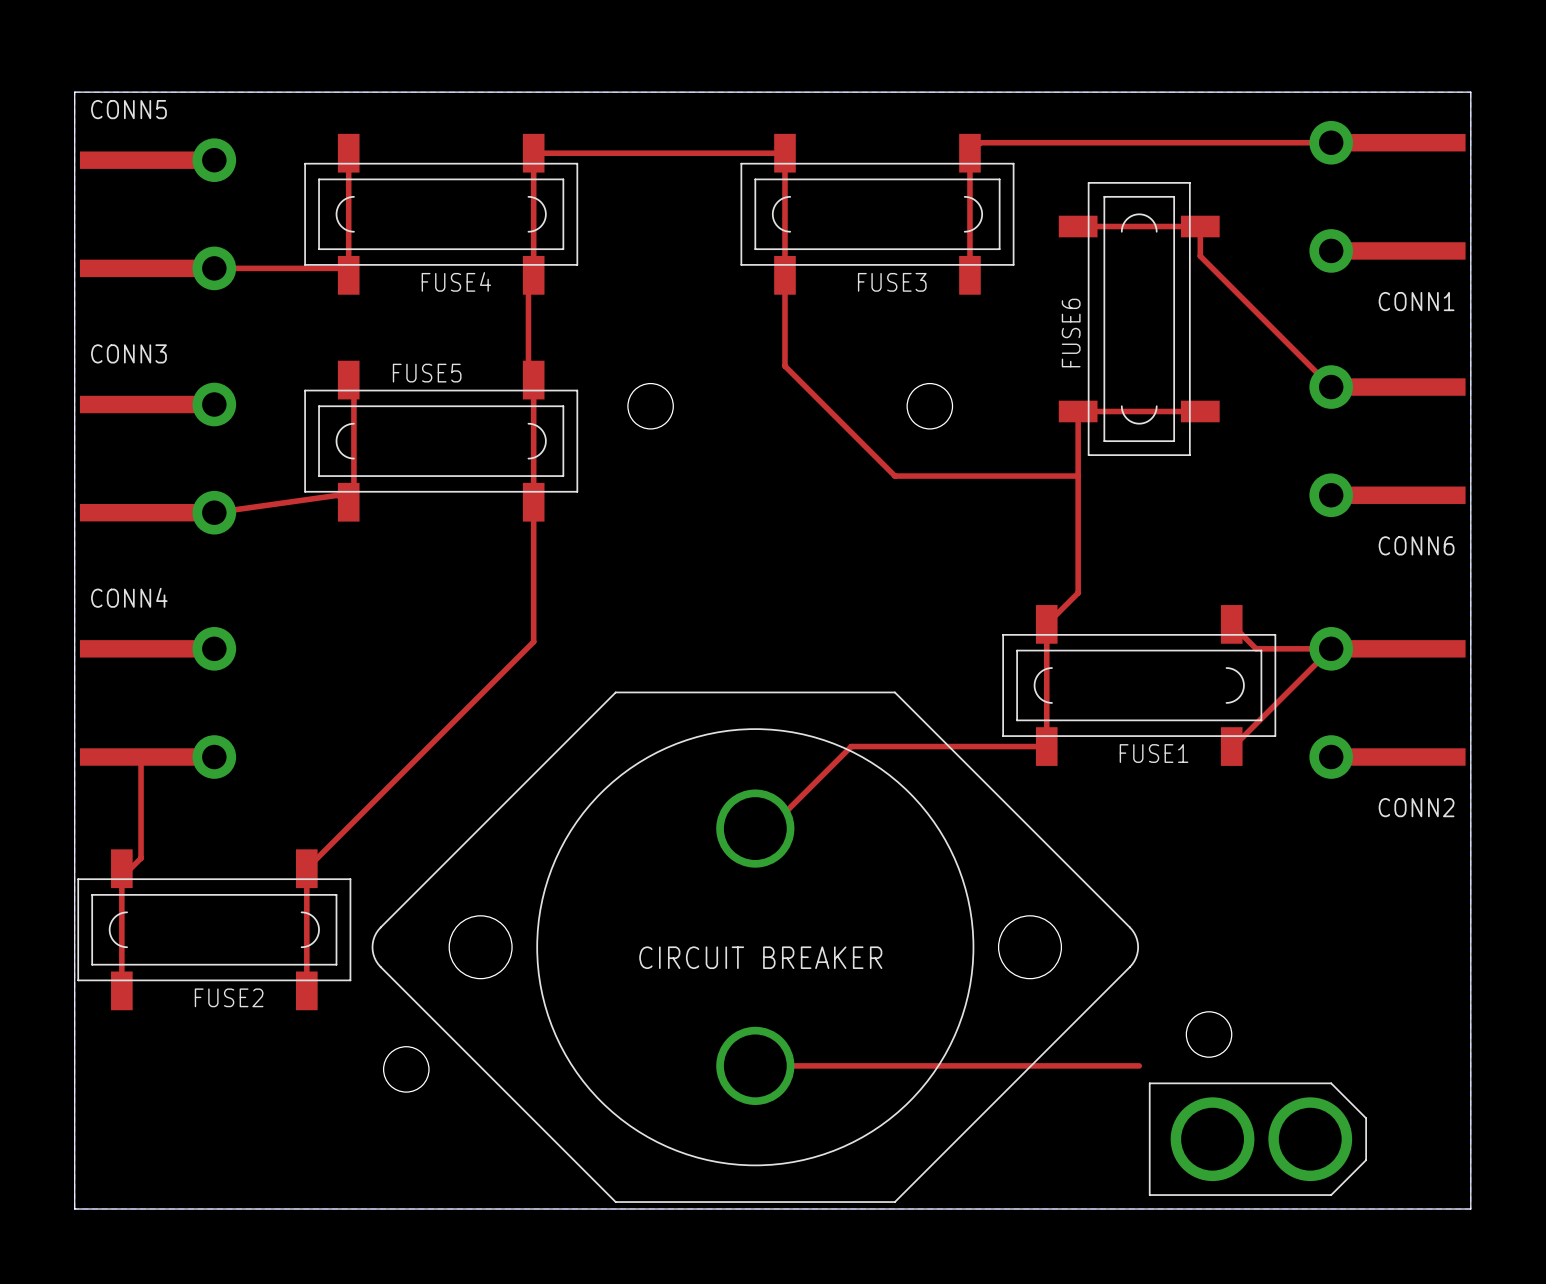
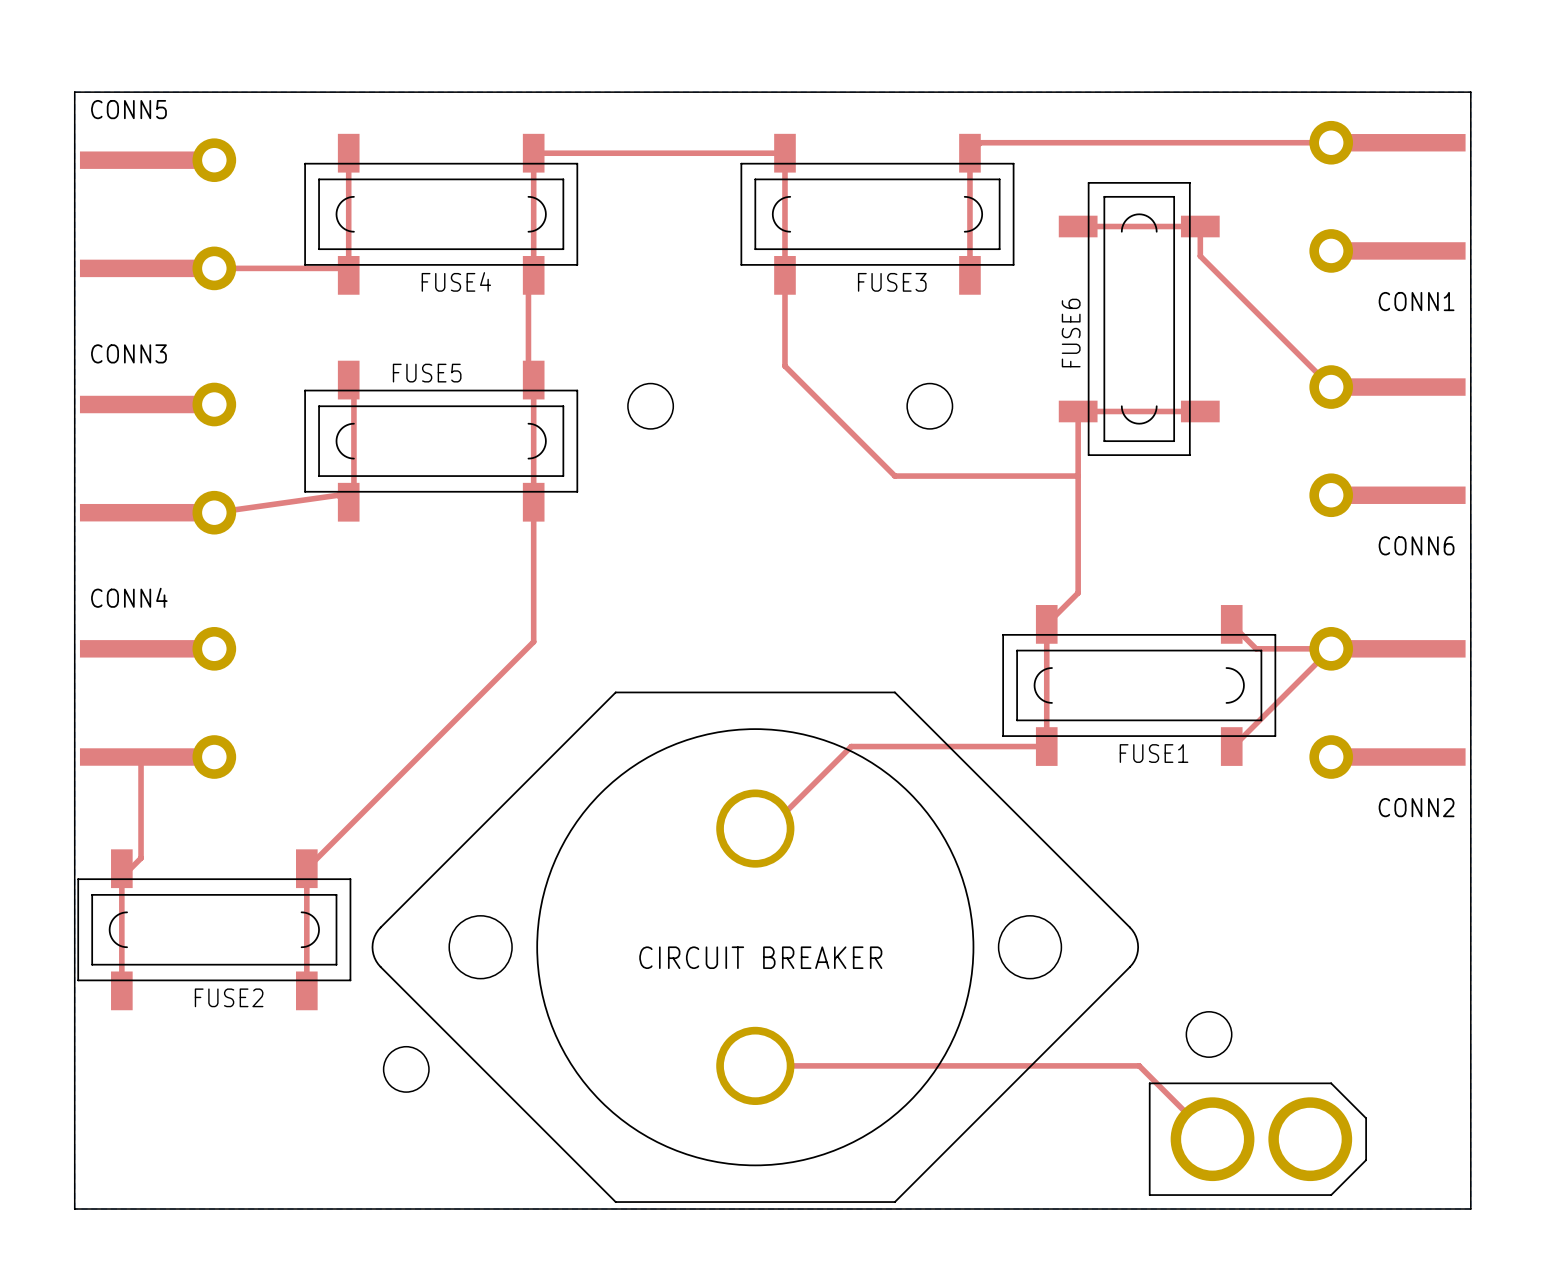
top track: none -> (1139, 1065) (1212, 1139)

